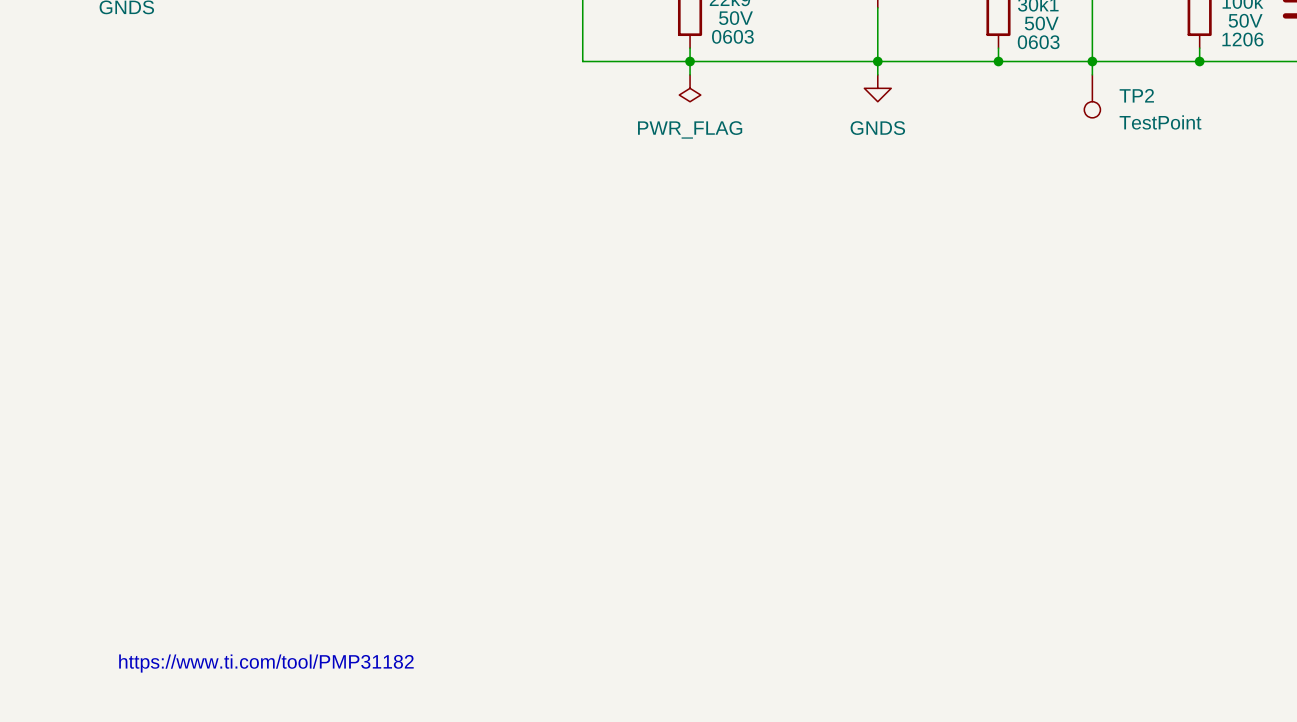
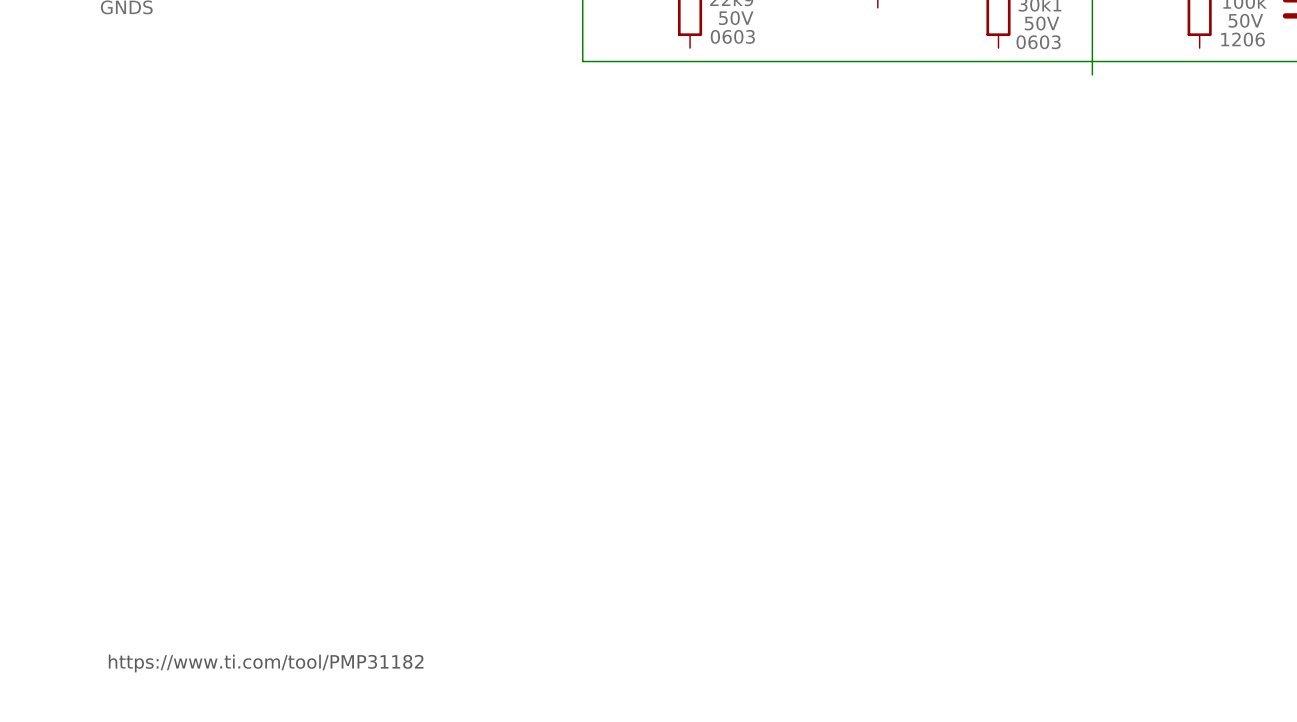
wire: (877, 7) (877, 74) -> none
wire: (690, 48) (690, 74) -> none
wire: (998, 48) (998, 61) -> none
wire: (1199, 48) (1199, 61) -> none
junction: (690, 61) -> none
junction: (877, 61) -> none
junction: (998, 61) -> none
junction: (1092, 61) -> none
junction: (1199, 61) -> none
power symbol: PWR_FLAG (690, 88) -> none
power symbol: GNDS (877, 88) -> none
TP2: TestPoint (1092, 96) -> none

